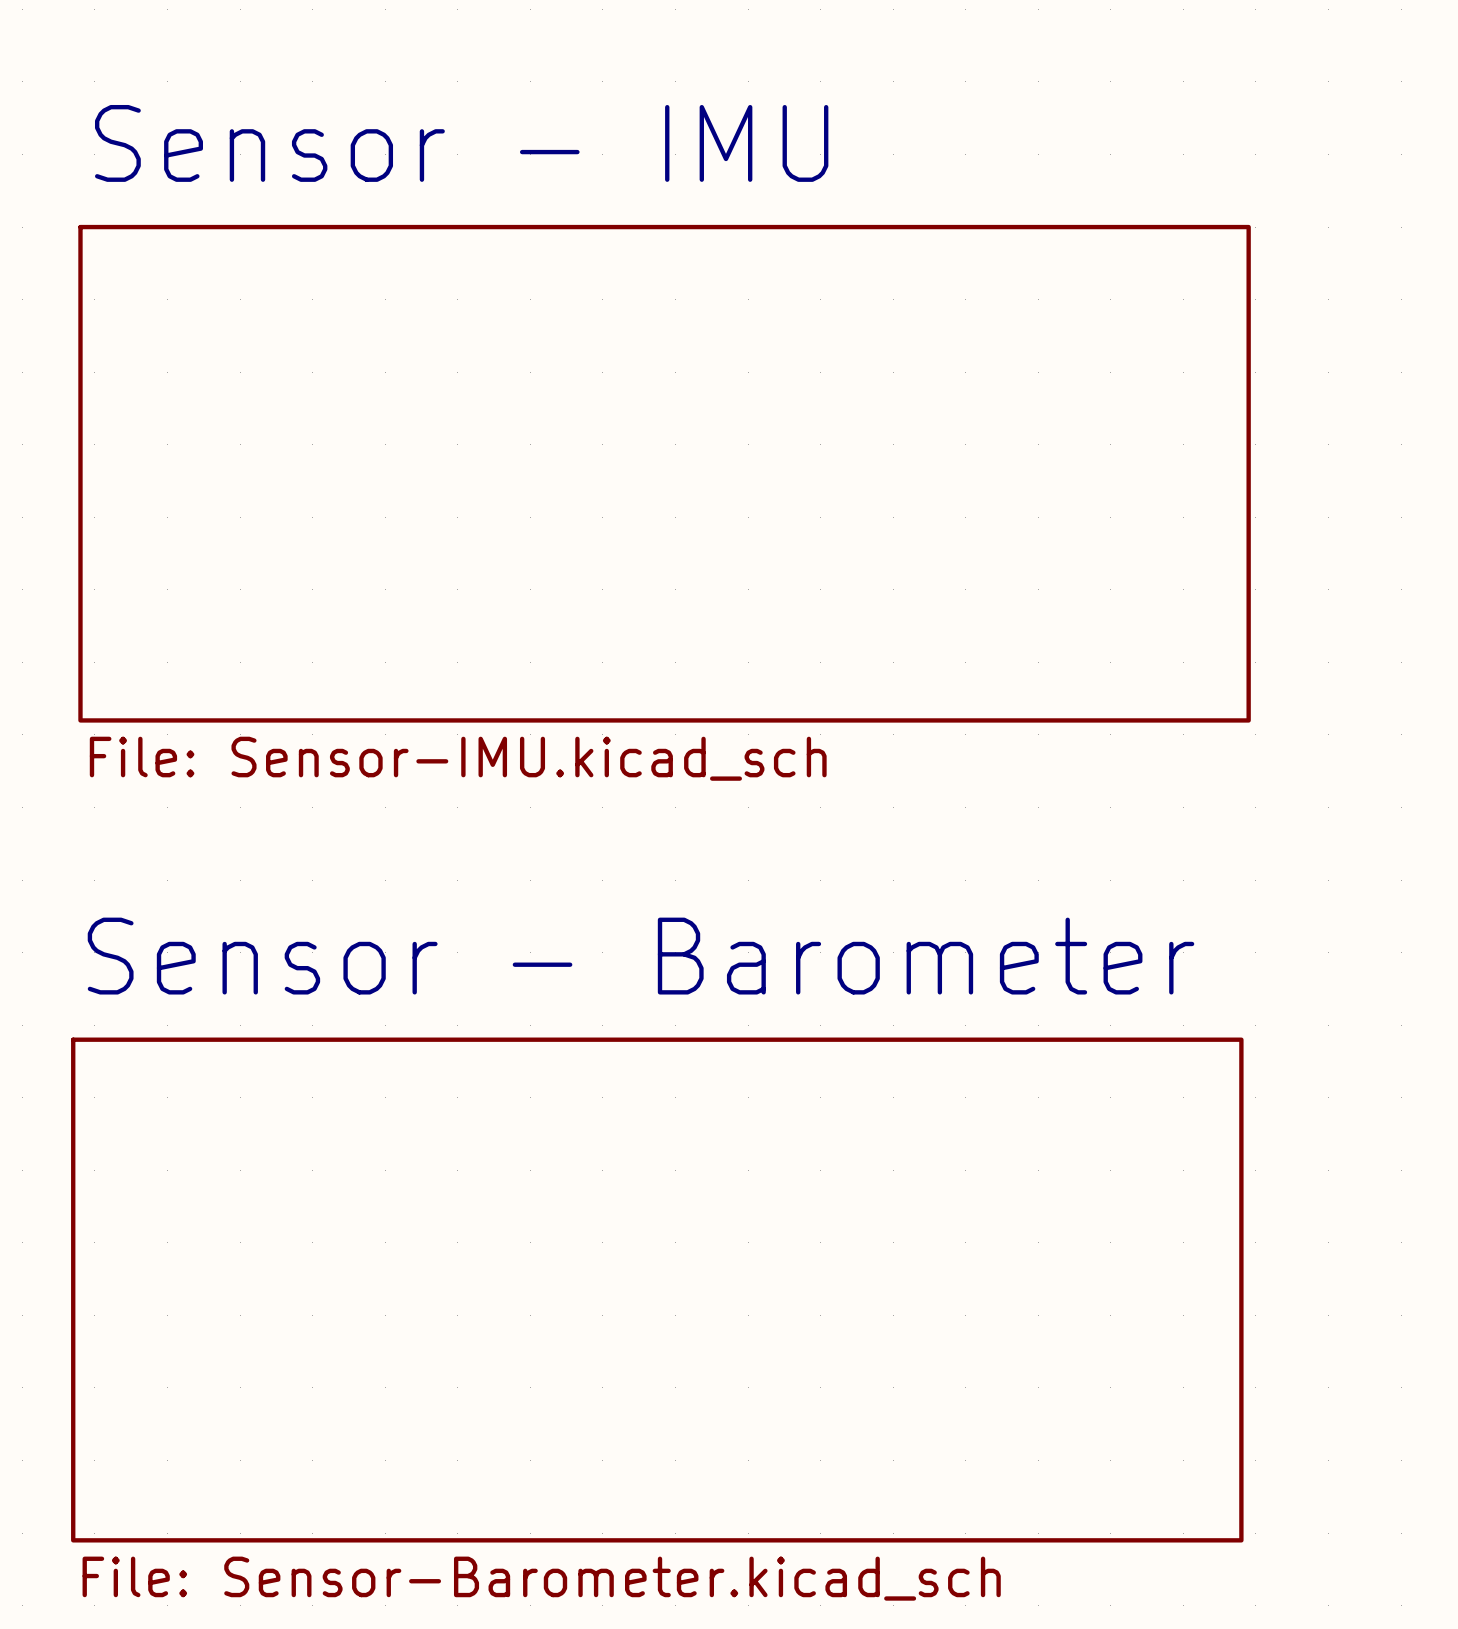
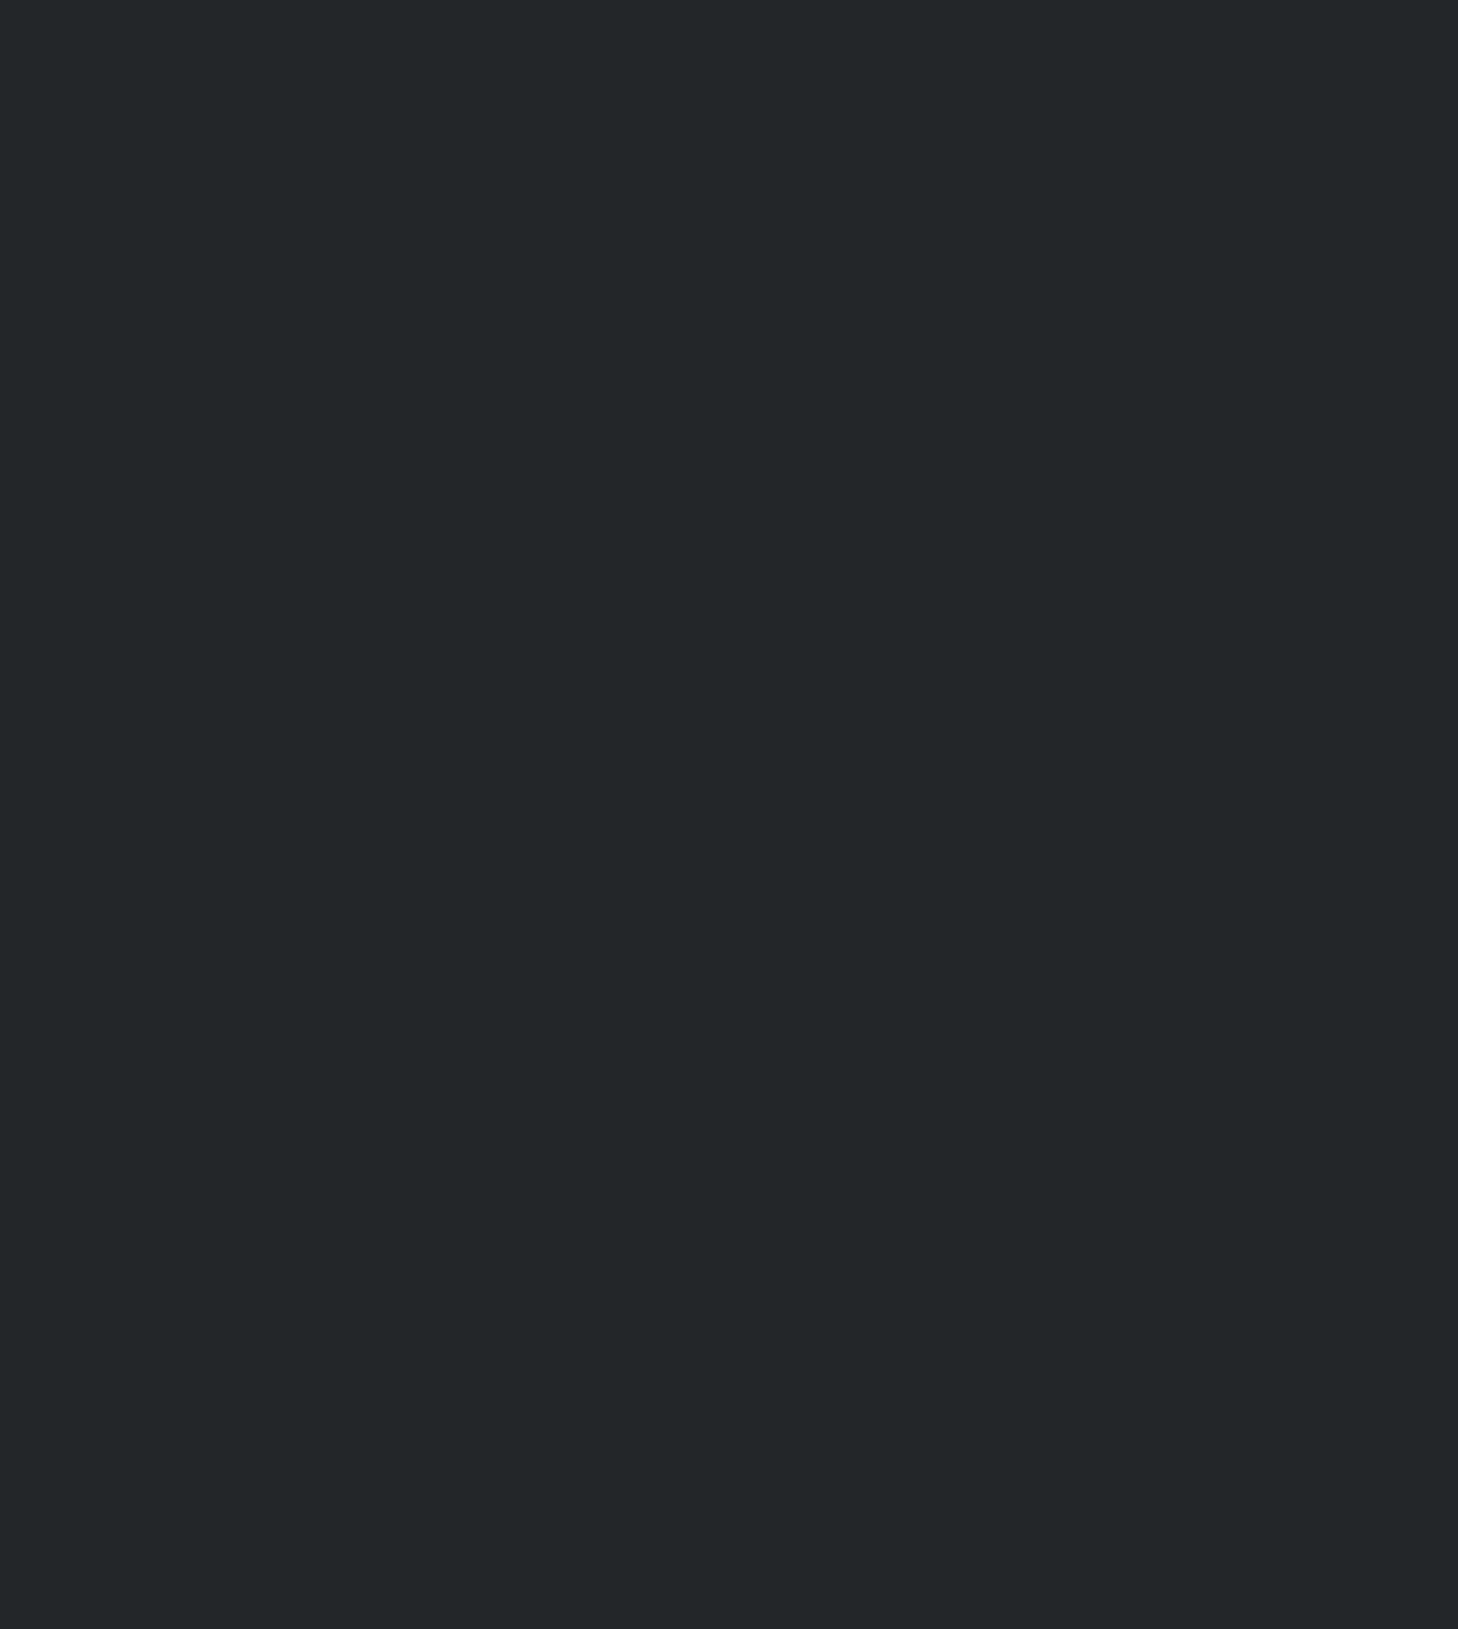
sheet Sensor - IMU: File: Sensor-IMU.kicad_sch (664, 473) -> none
sheet Sensor - Barometer: File: Sensor-Barometer.kicad_sch (657, 1290) -> none

